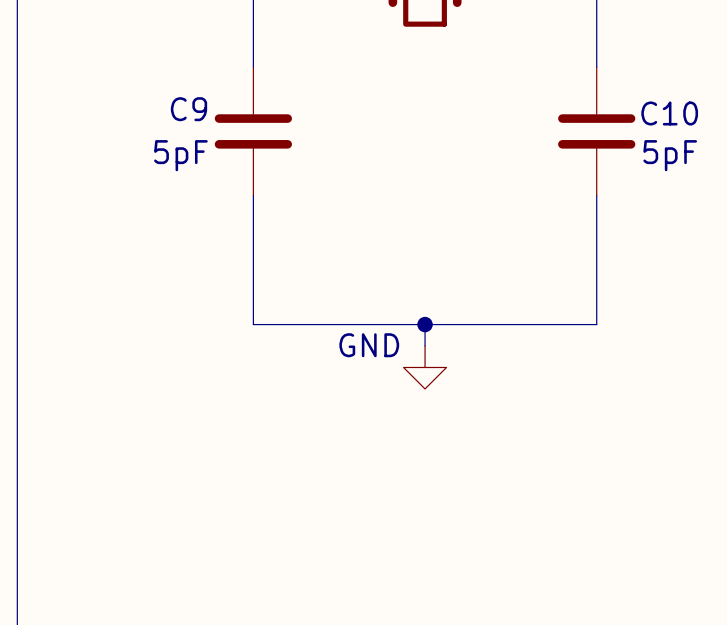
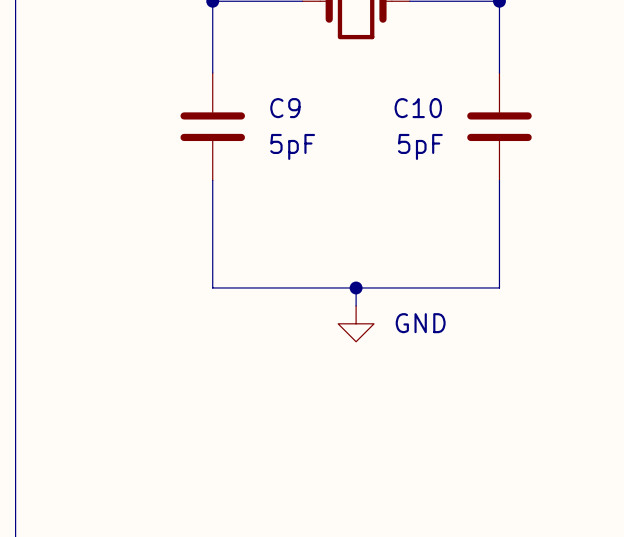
C9 name position: C9 (189, 109) -> C9 (285, 108)
C10 name position: C10 (669, 113) -> C10 (418, 108)
C9 value position: 5pF (180, 155) -> 5pF (292, 146)
C10 value position: 5pF (670, 155) -> 5pF (420, 146)
power symbol text position: GND (369, 345) -> GND (420, 323)

